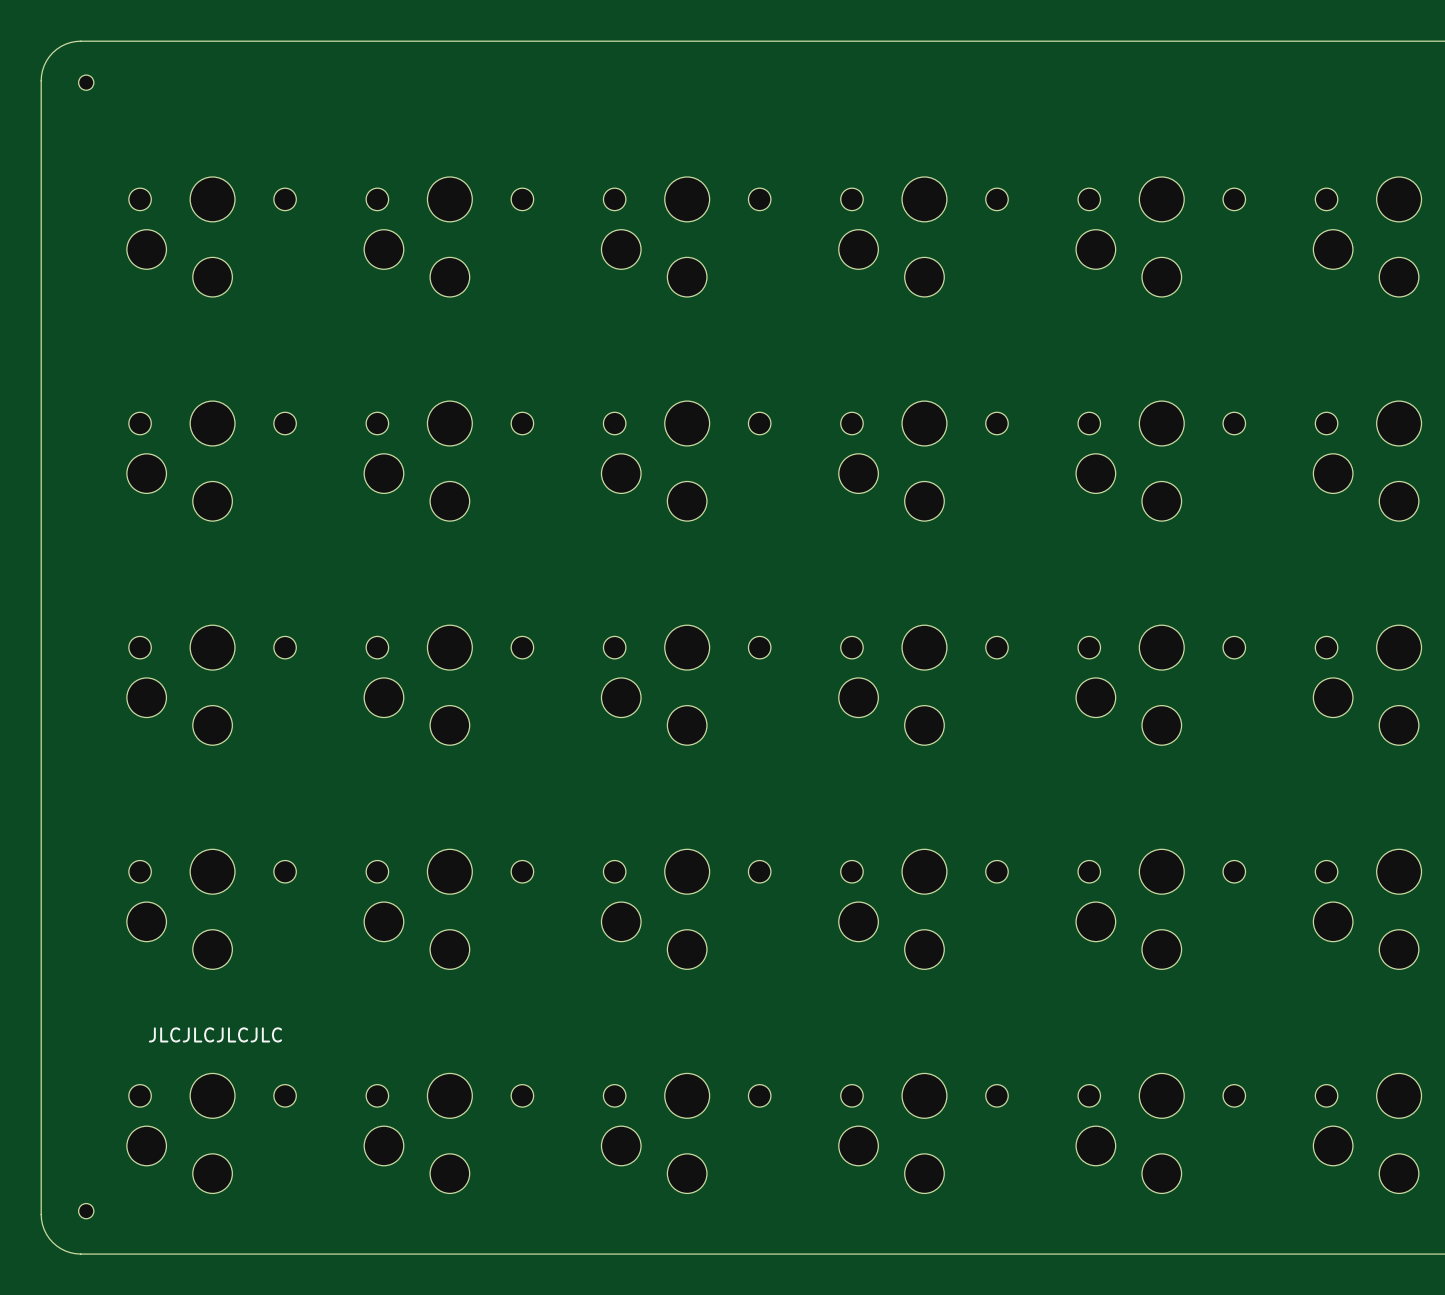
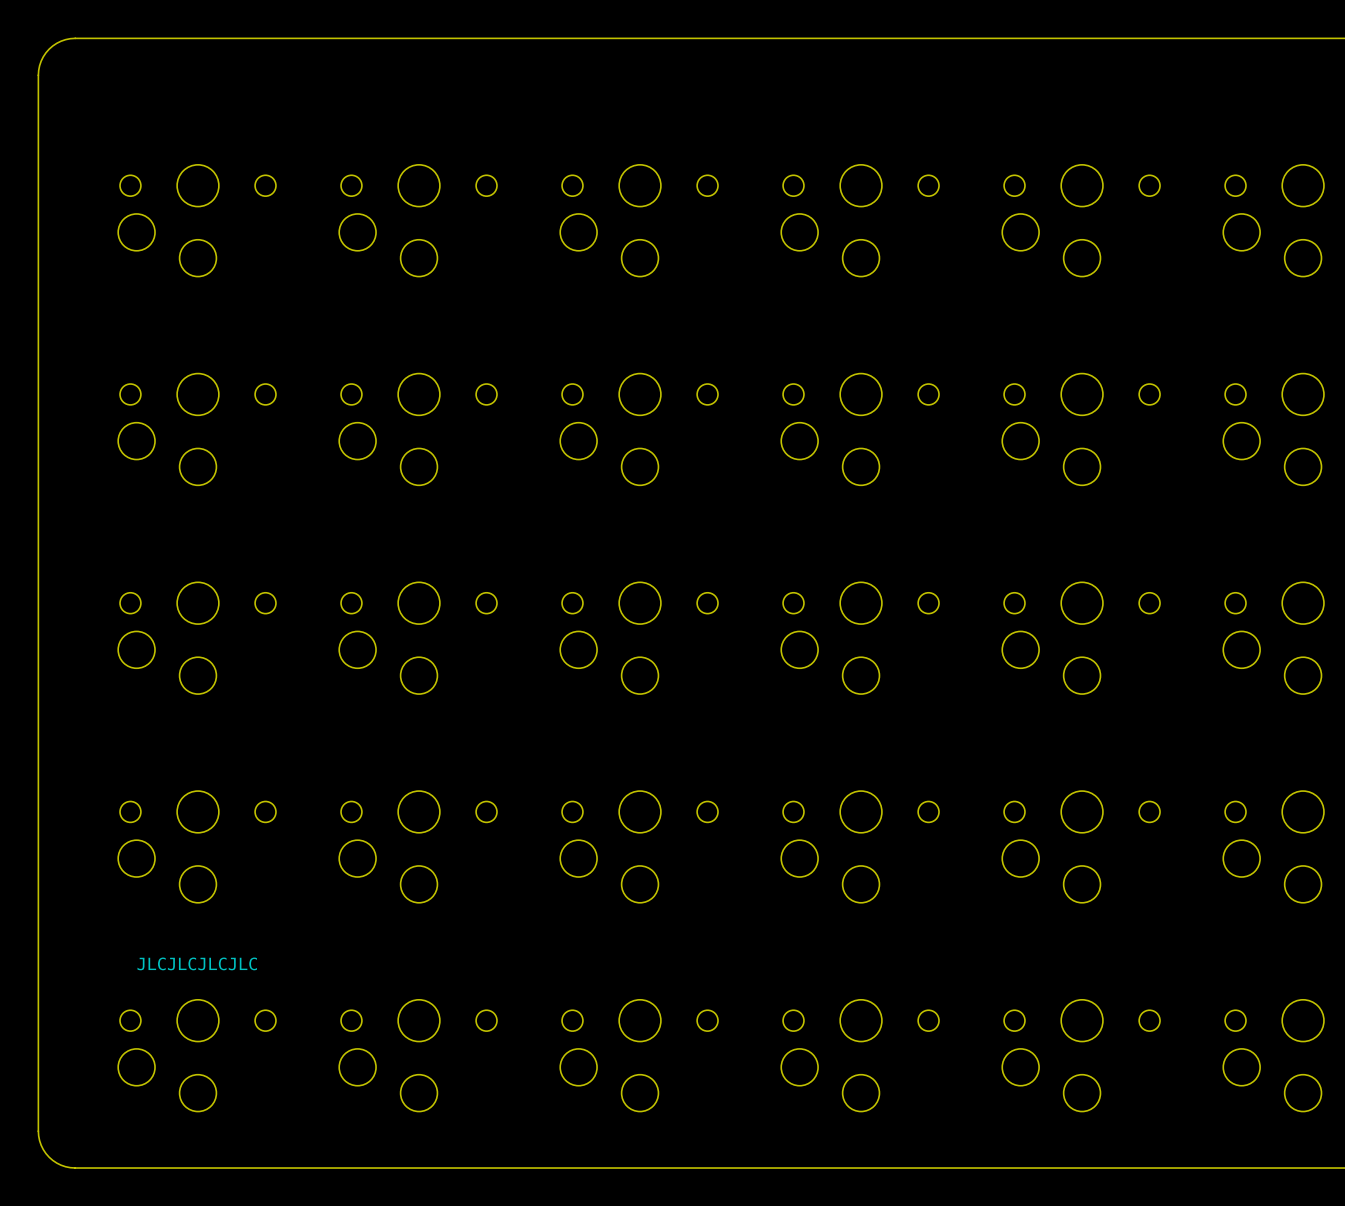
part: (86, 82) -> none
part: (86, 1211) -> none

